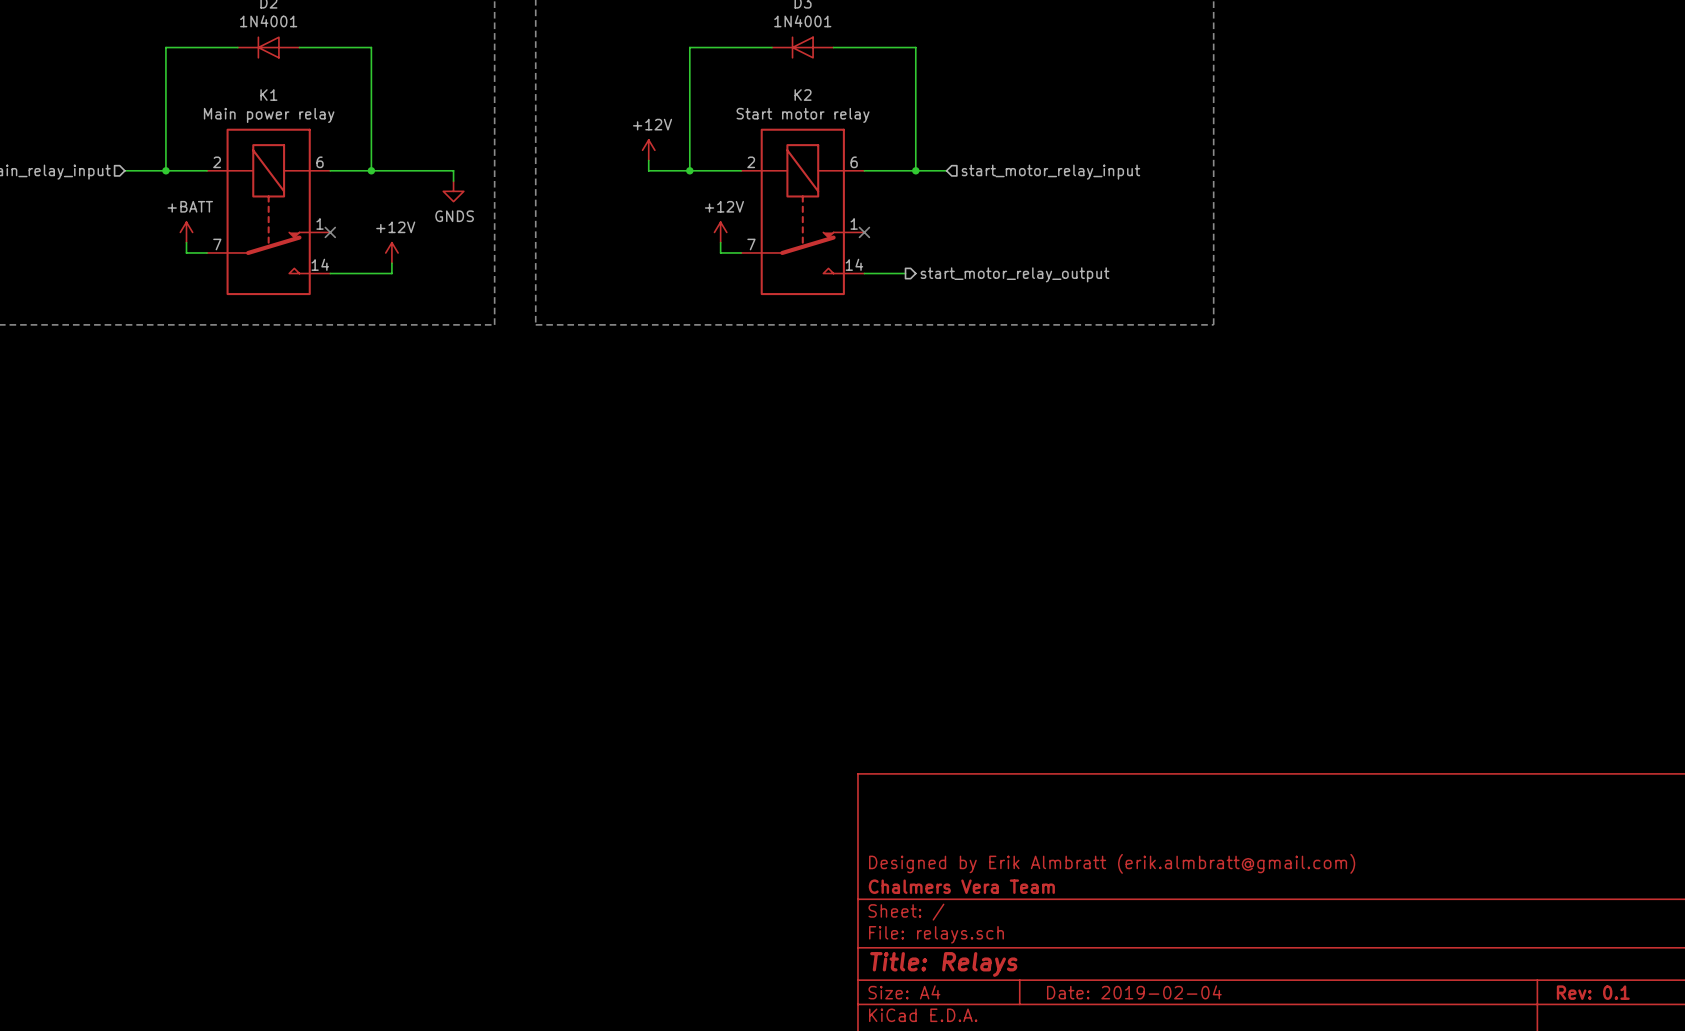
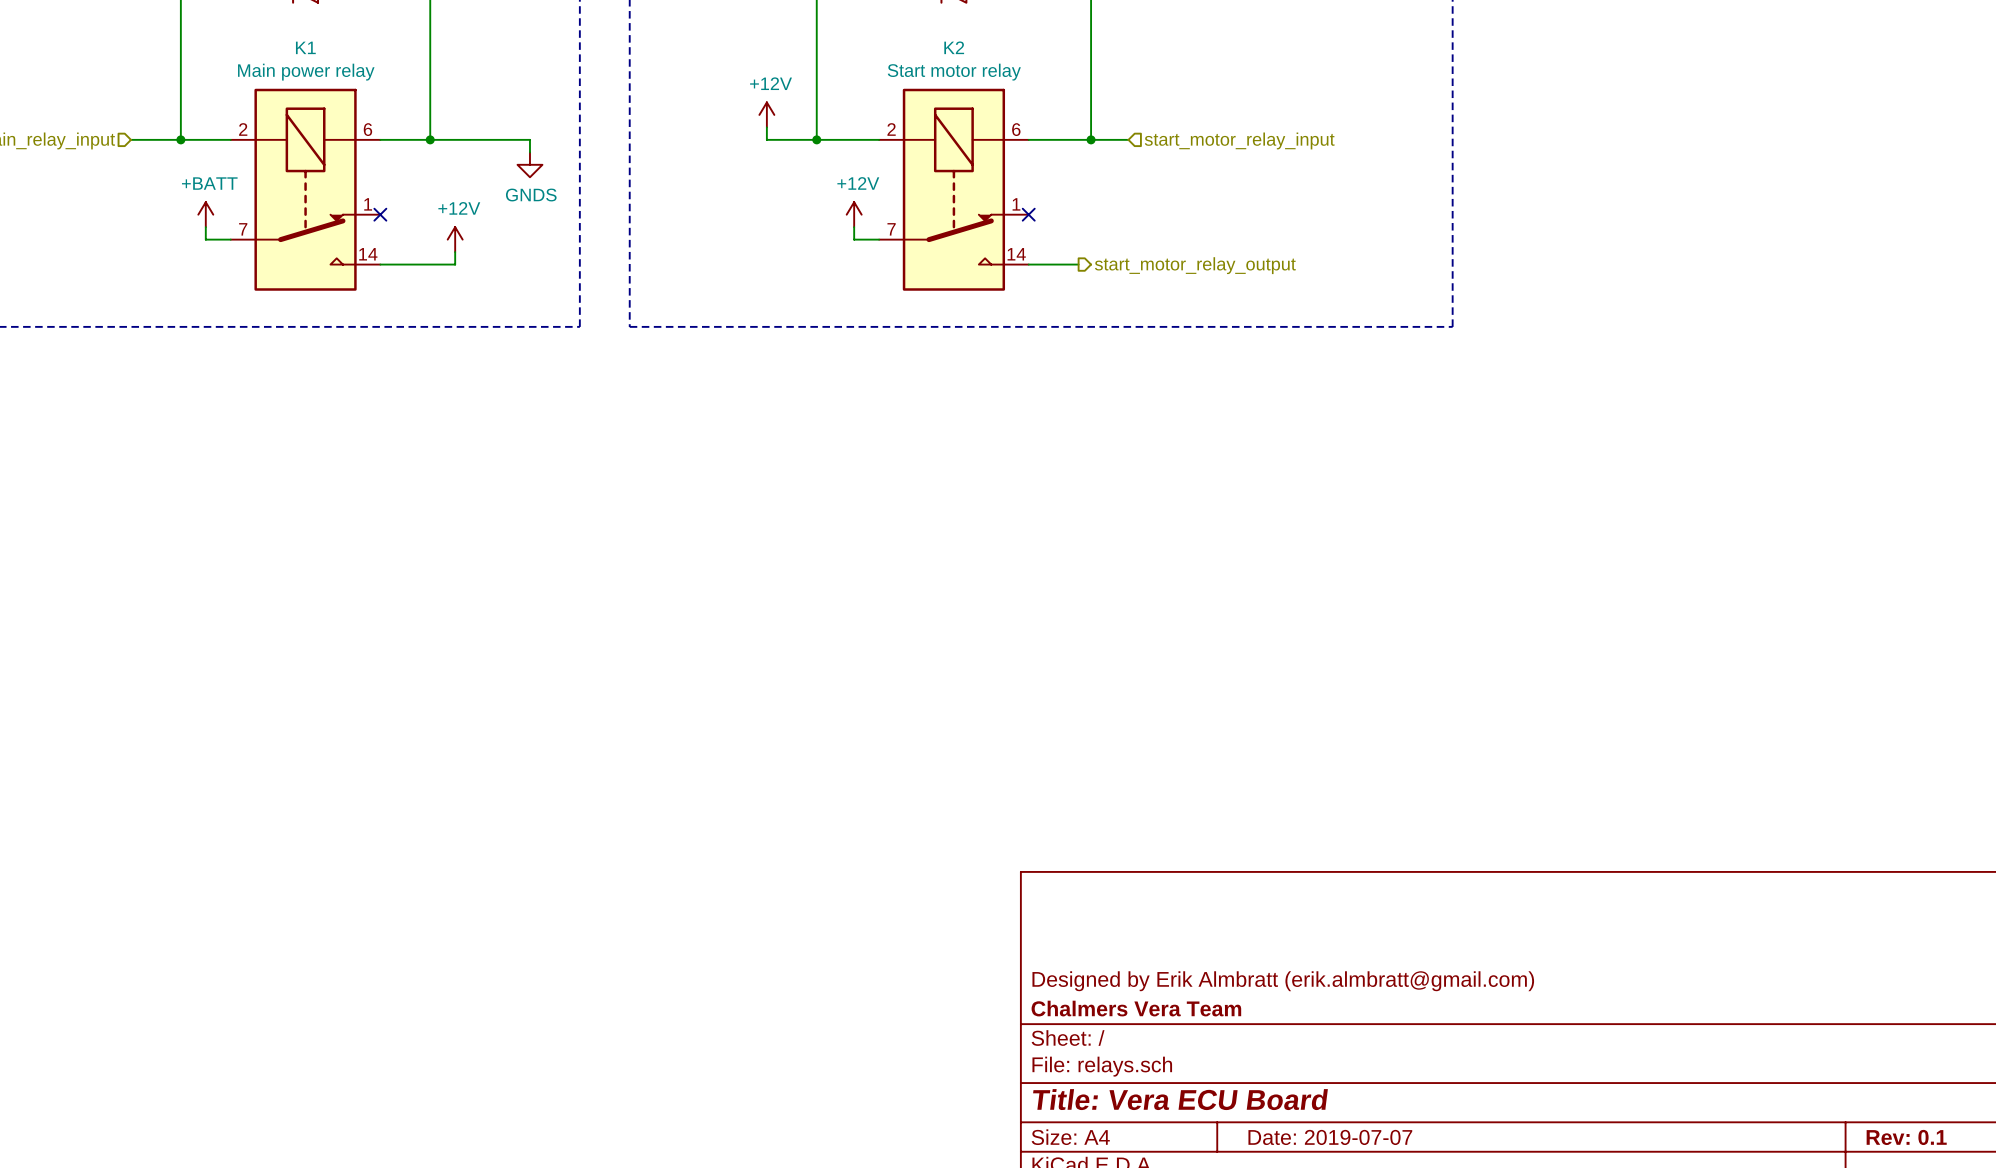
title block: Title: Relays (943, 964) -> Title: Vera ECU Board (1180, 1099)
title block: Date: 2019-02-04 (1134, 992) -> Date: 2019-07-07 (1330, 1137)

